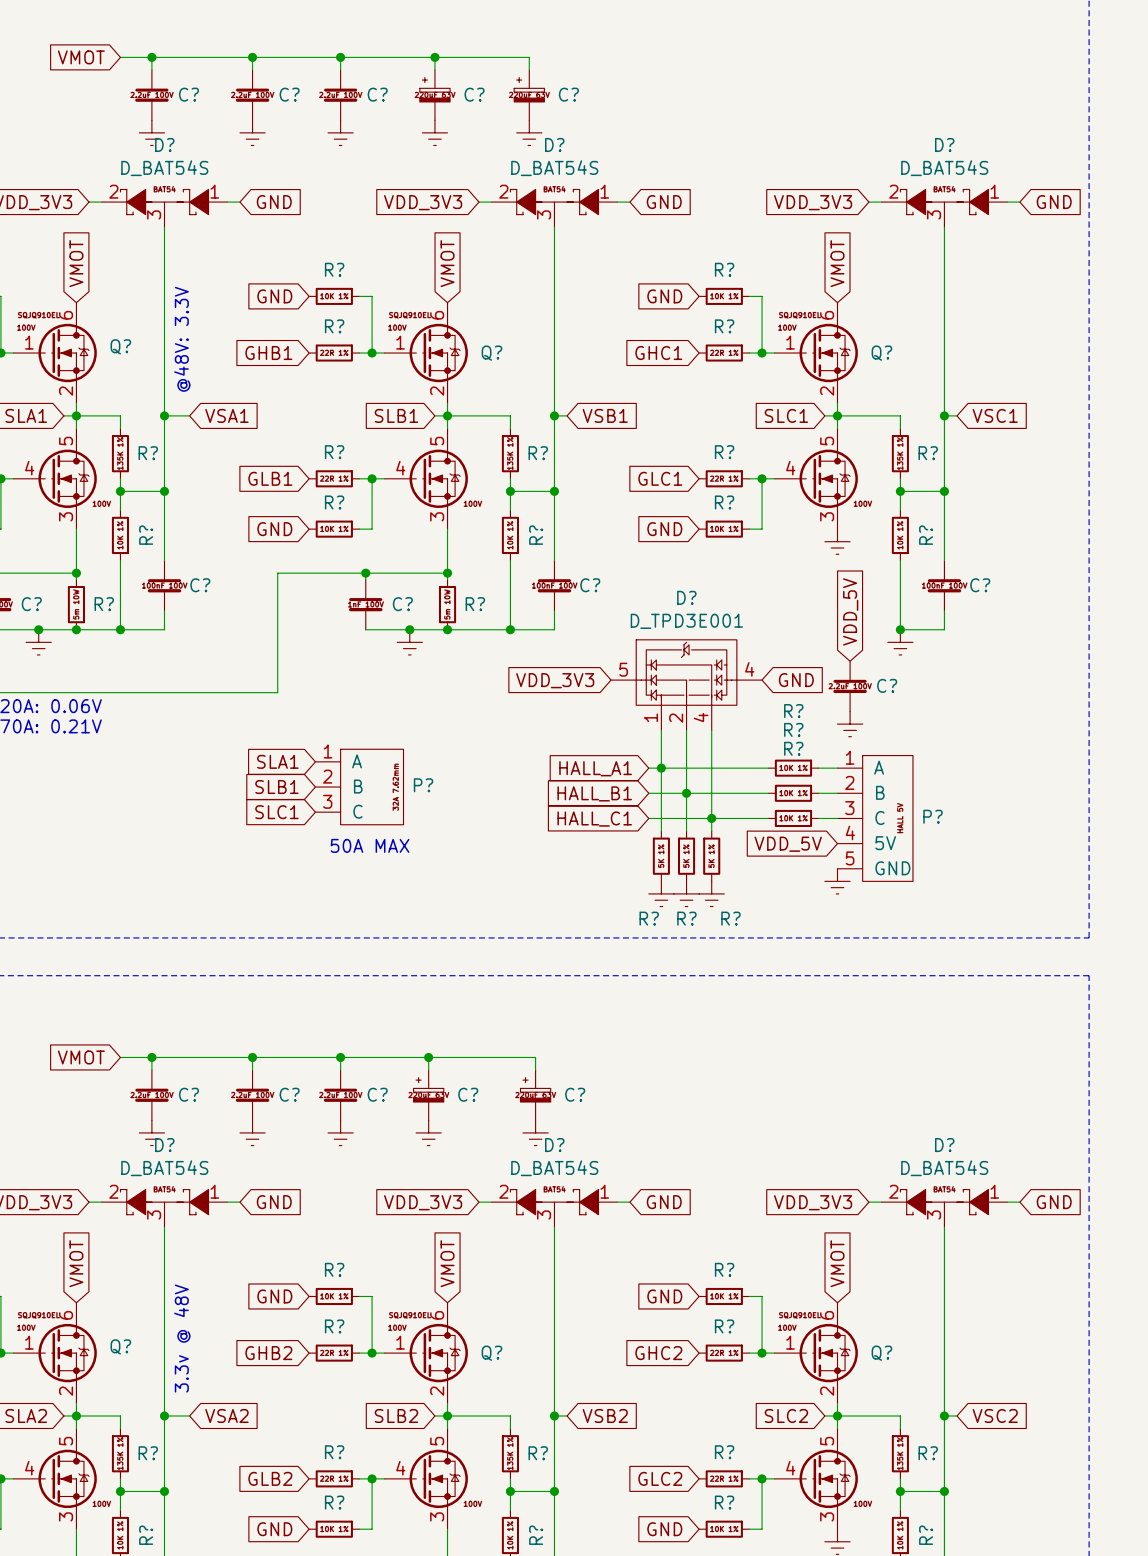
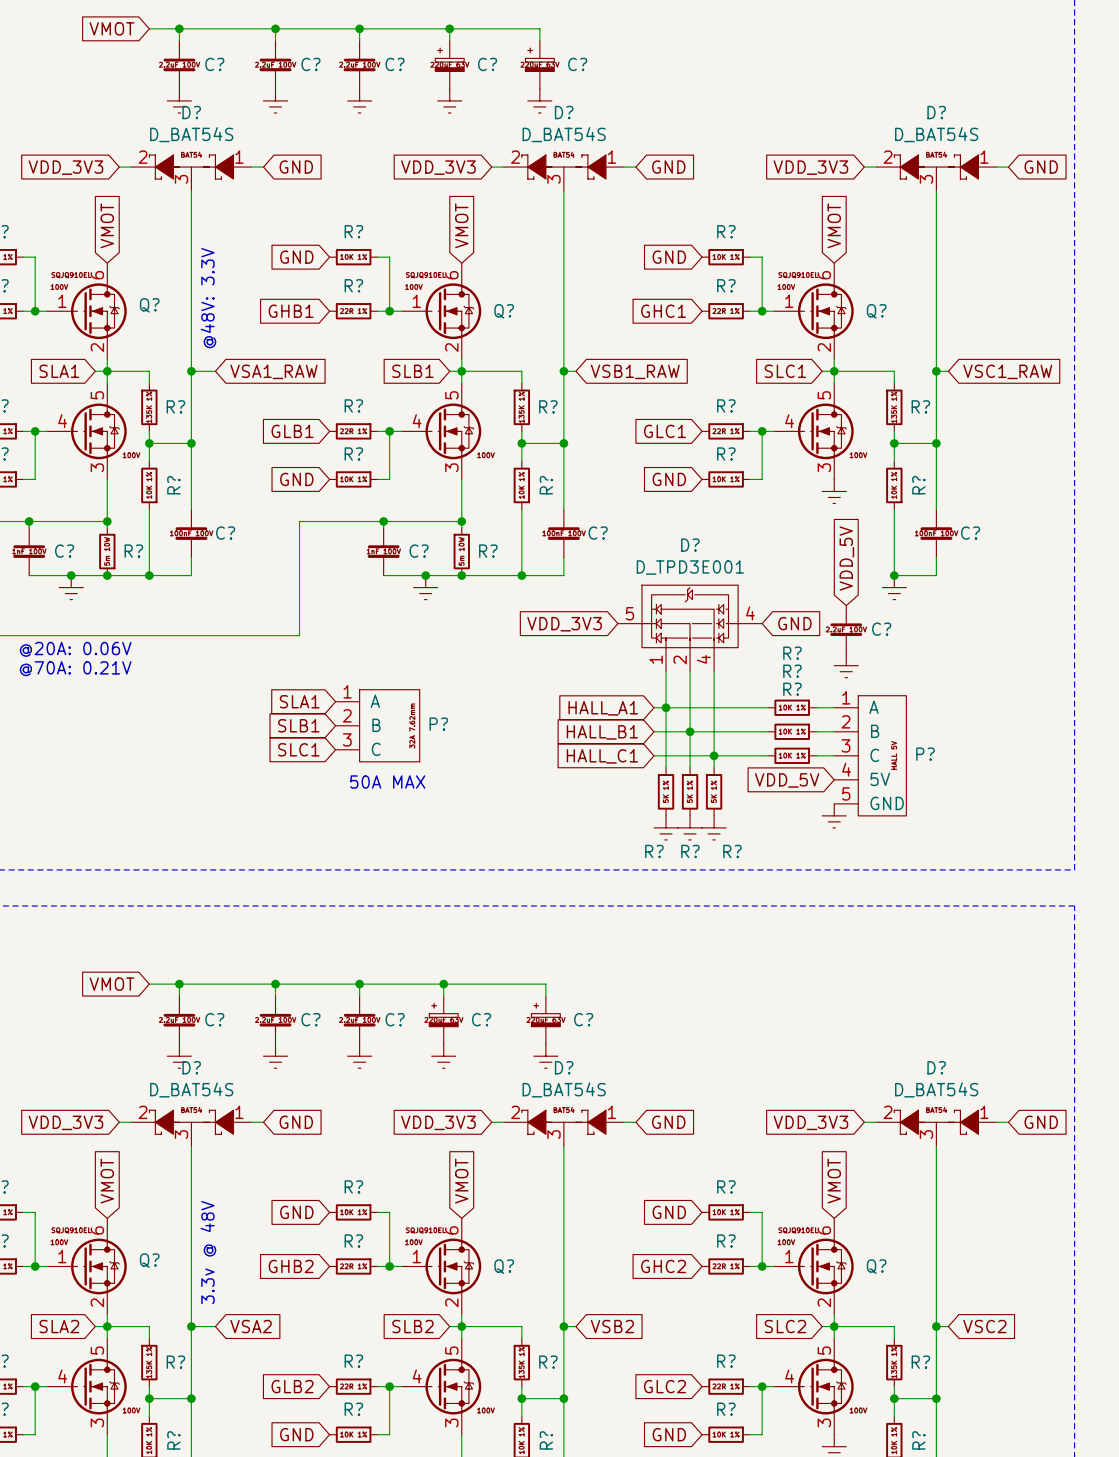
global label: VSA1 (226, 415) -> VSA1_RAW (273, 371)
global label: VSB1 (605, 415) -> VSB1_RAW (635, 371)
global label: VSC1 (995, 415) -> VSC1_RAW (1007, 371)

